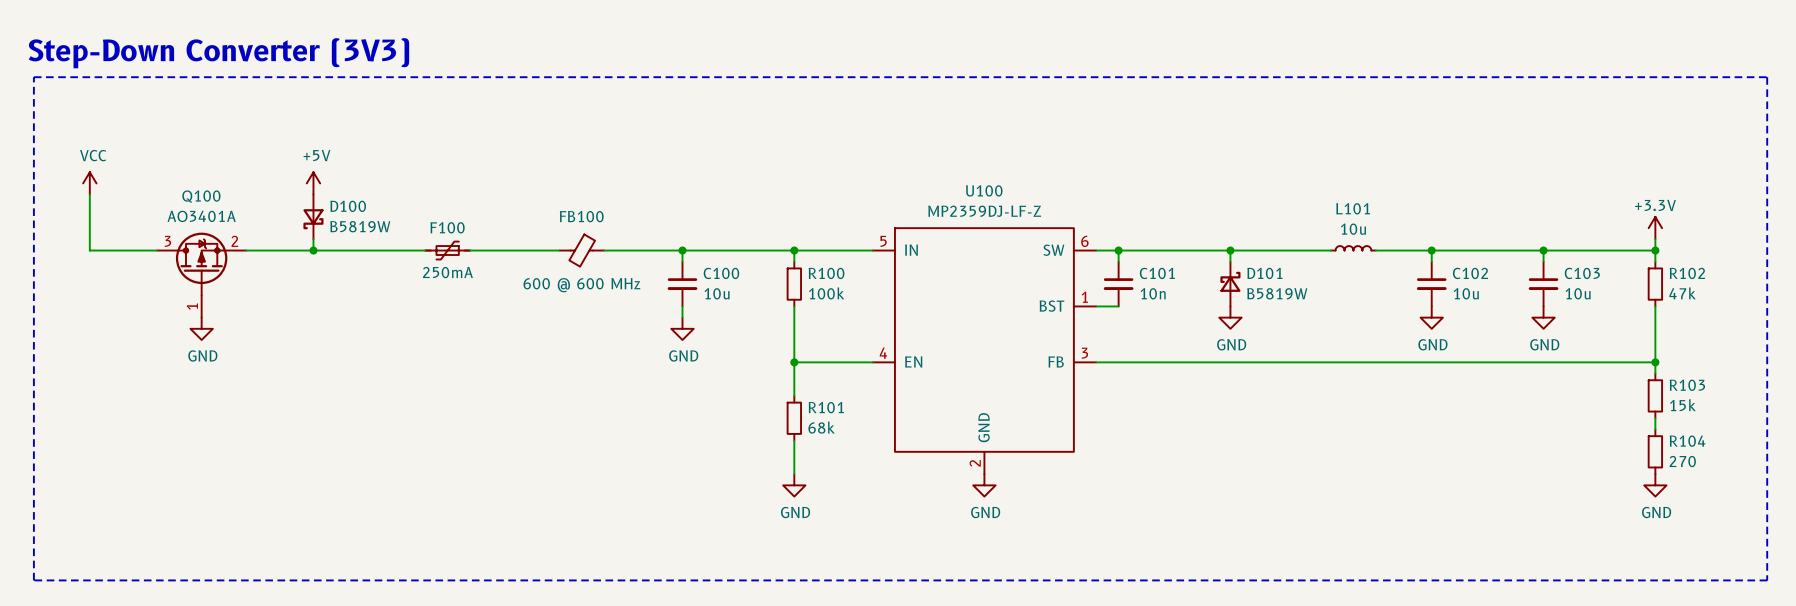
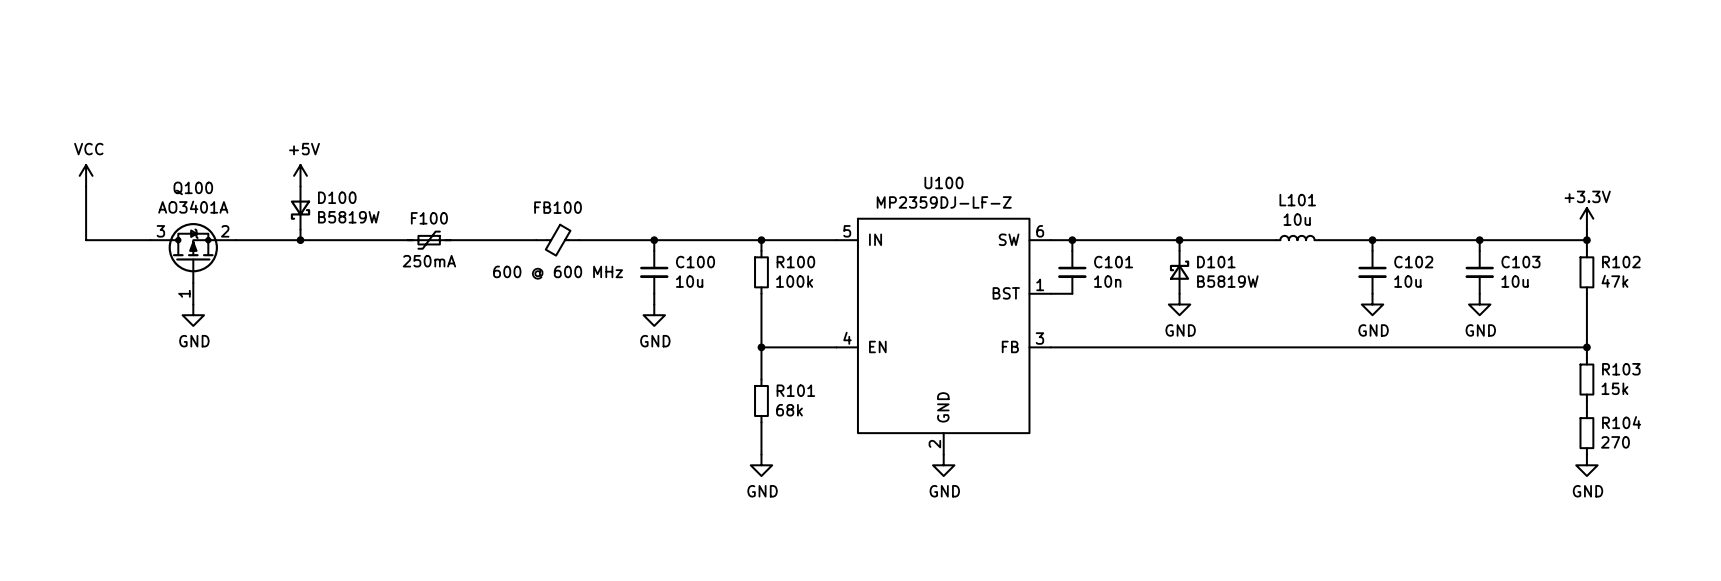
text: Step-Down Converter (3V3) (218, 53) -> none
line: (33, 77) (1767, 77) (1767, 580) (33, 580) (33, 77) -> none

